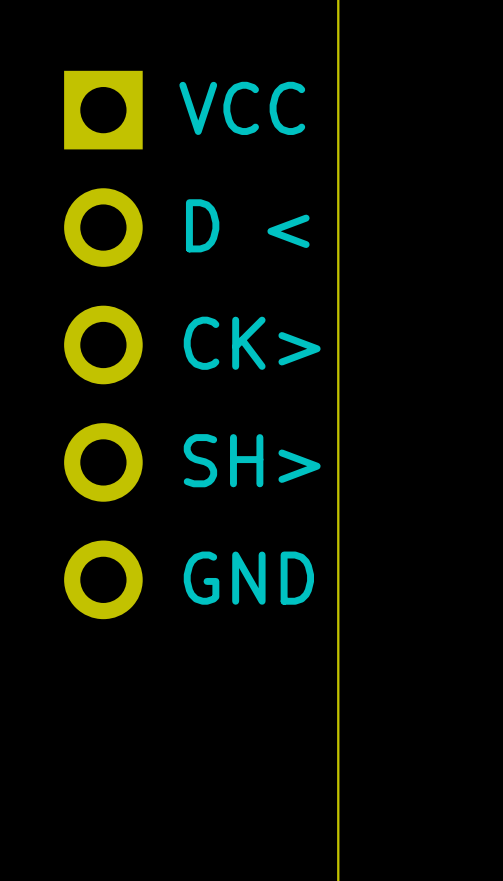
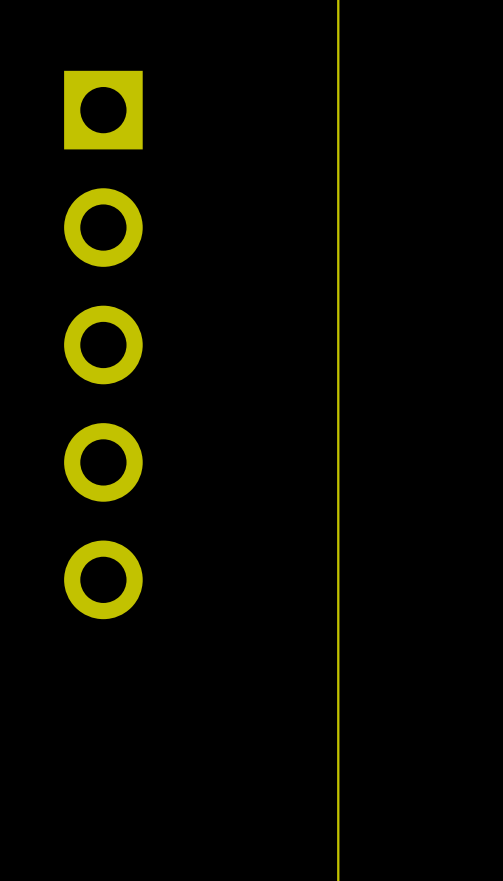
text: VCC (242, 108) -> none
text: D < (247, 225) -> none
text: CK> (252, 343) -> none
text: SH> (252, 460) -> none
text: GND (248, 578) -> none

